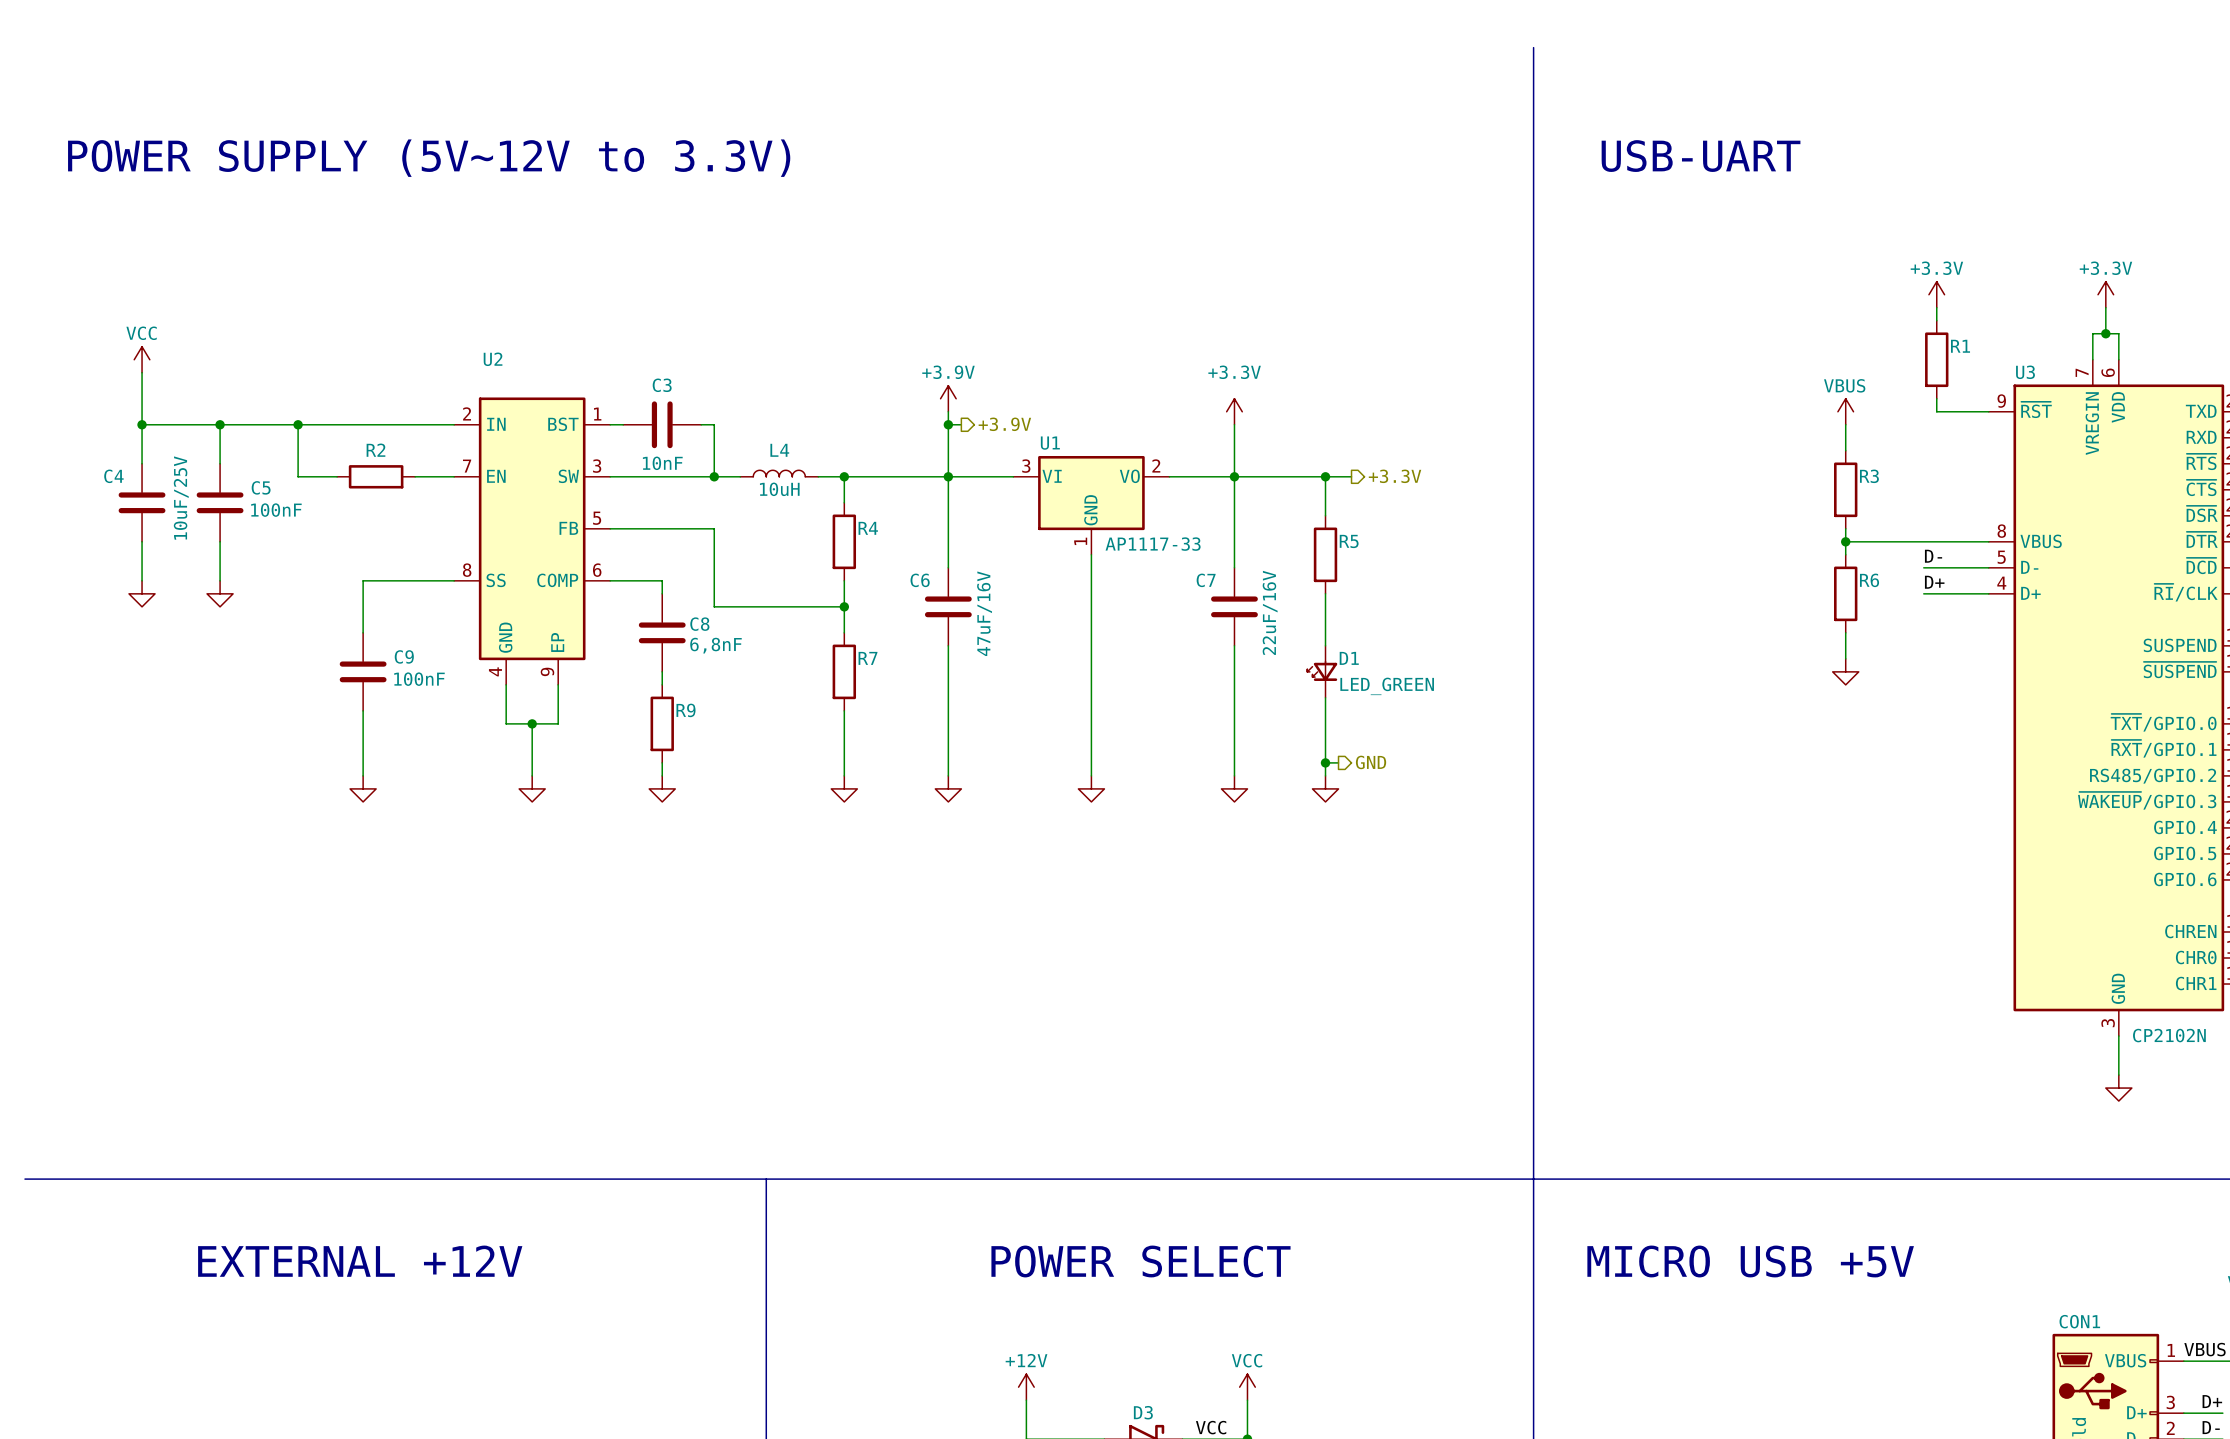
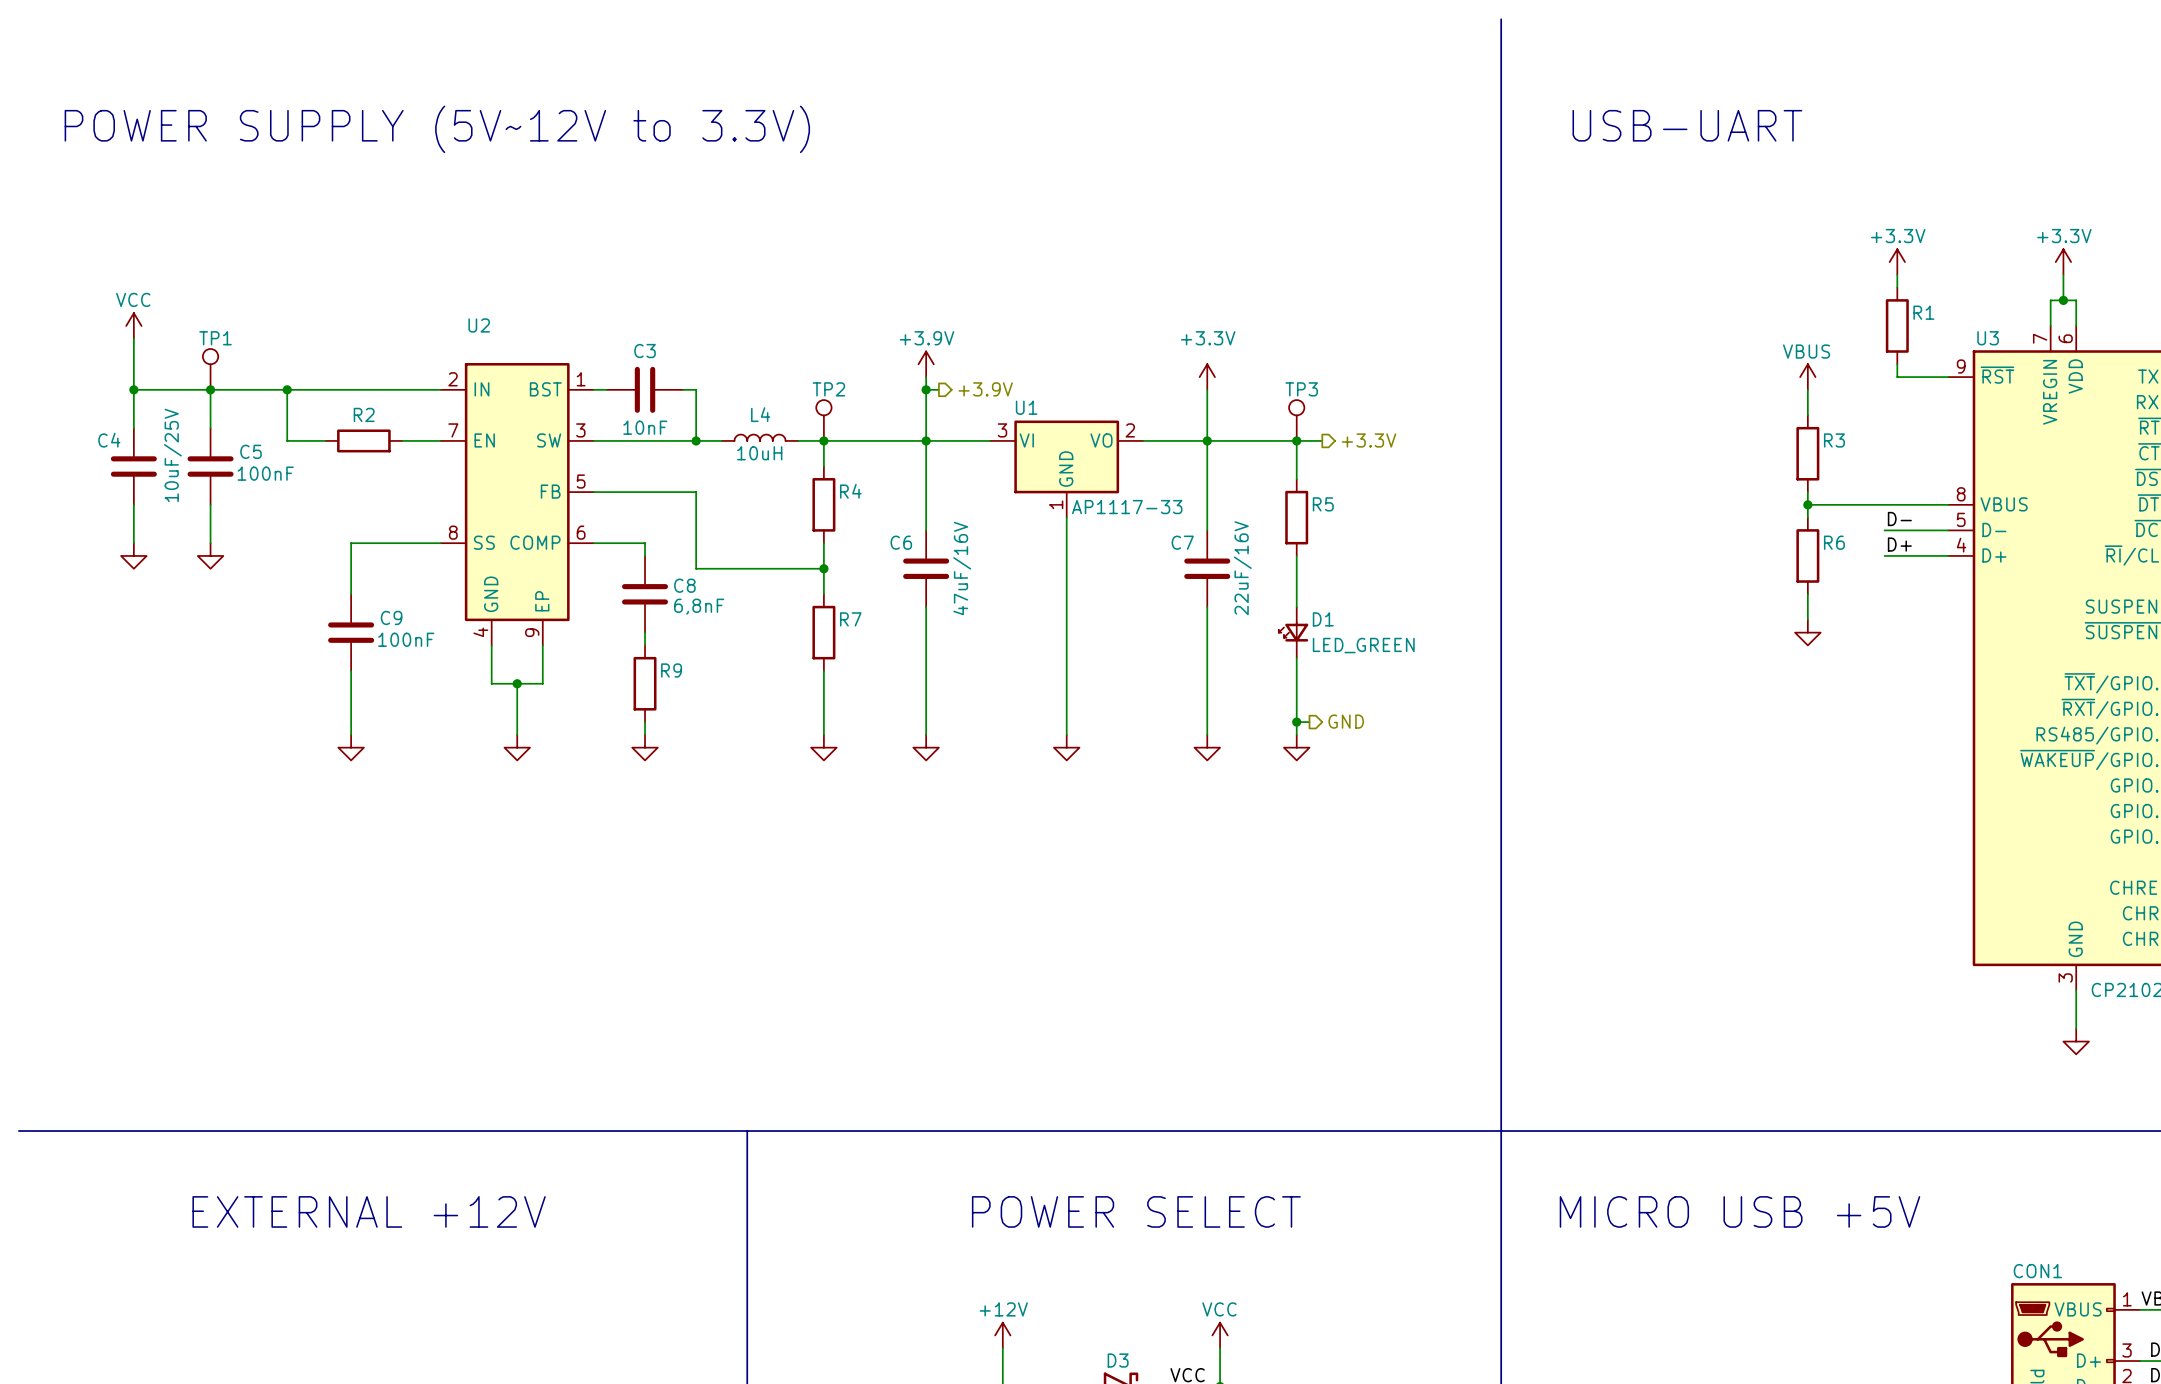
TP1: none -> (210, 369)
TP2: none -> (823, 420)
TP3: none -> (1296, 420)

